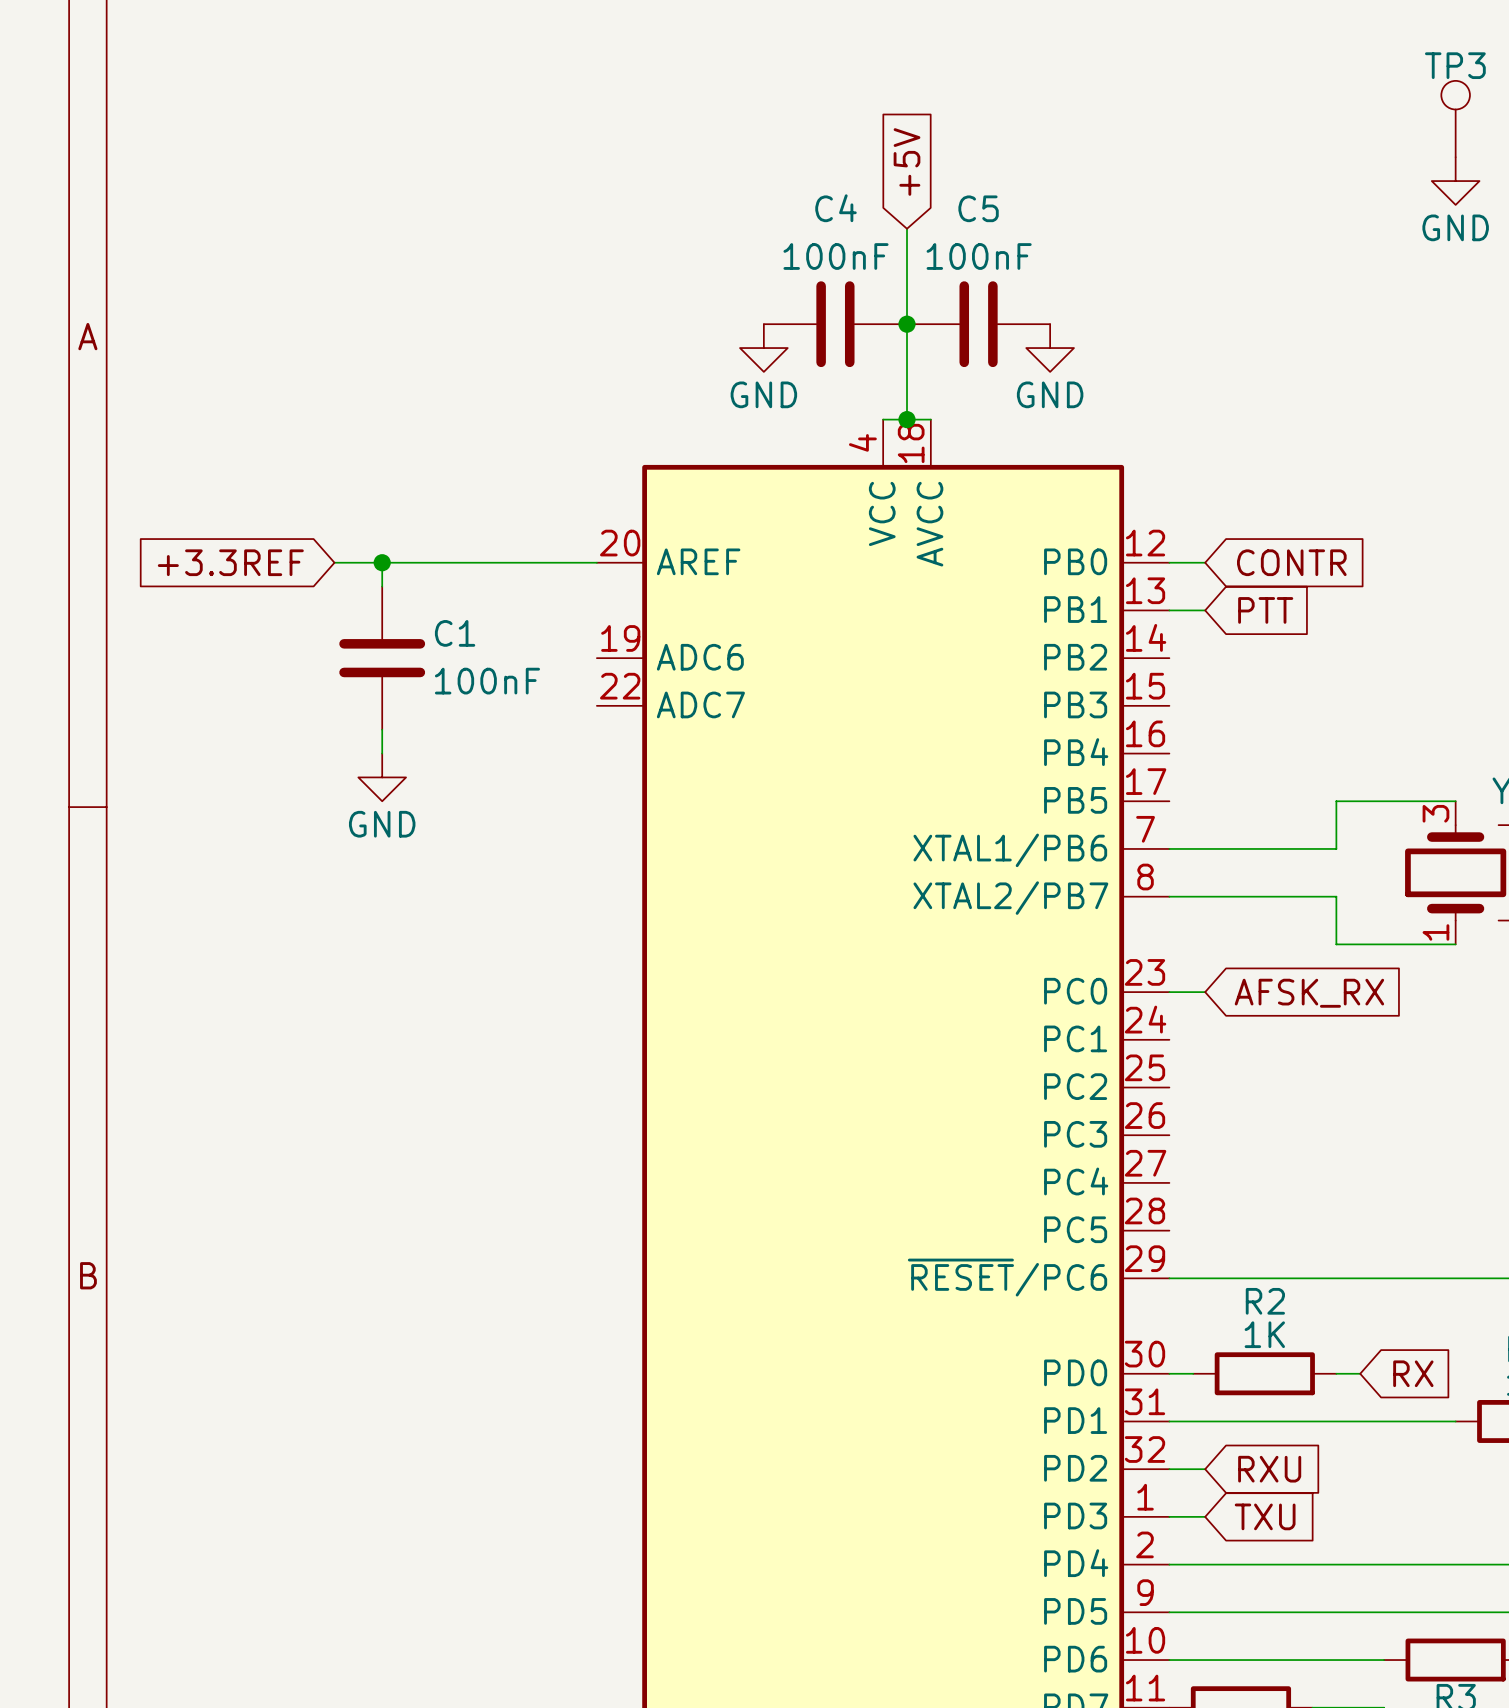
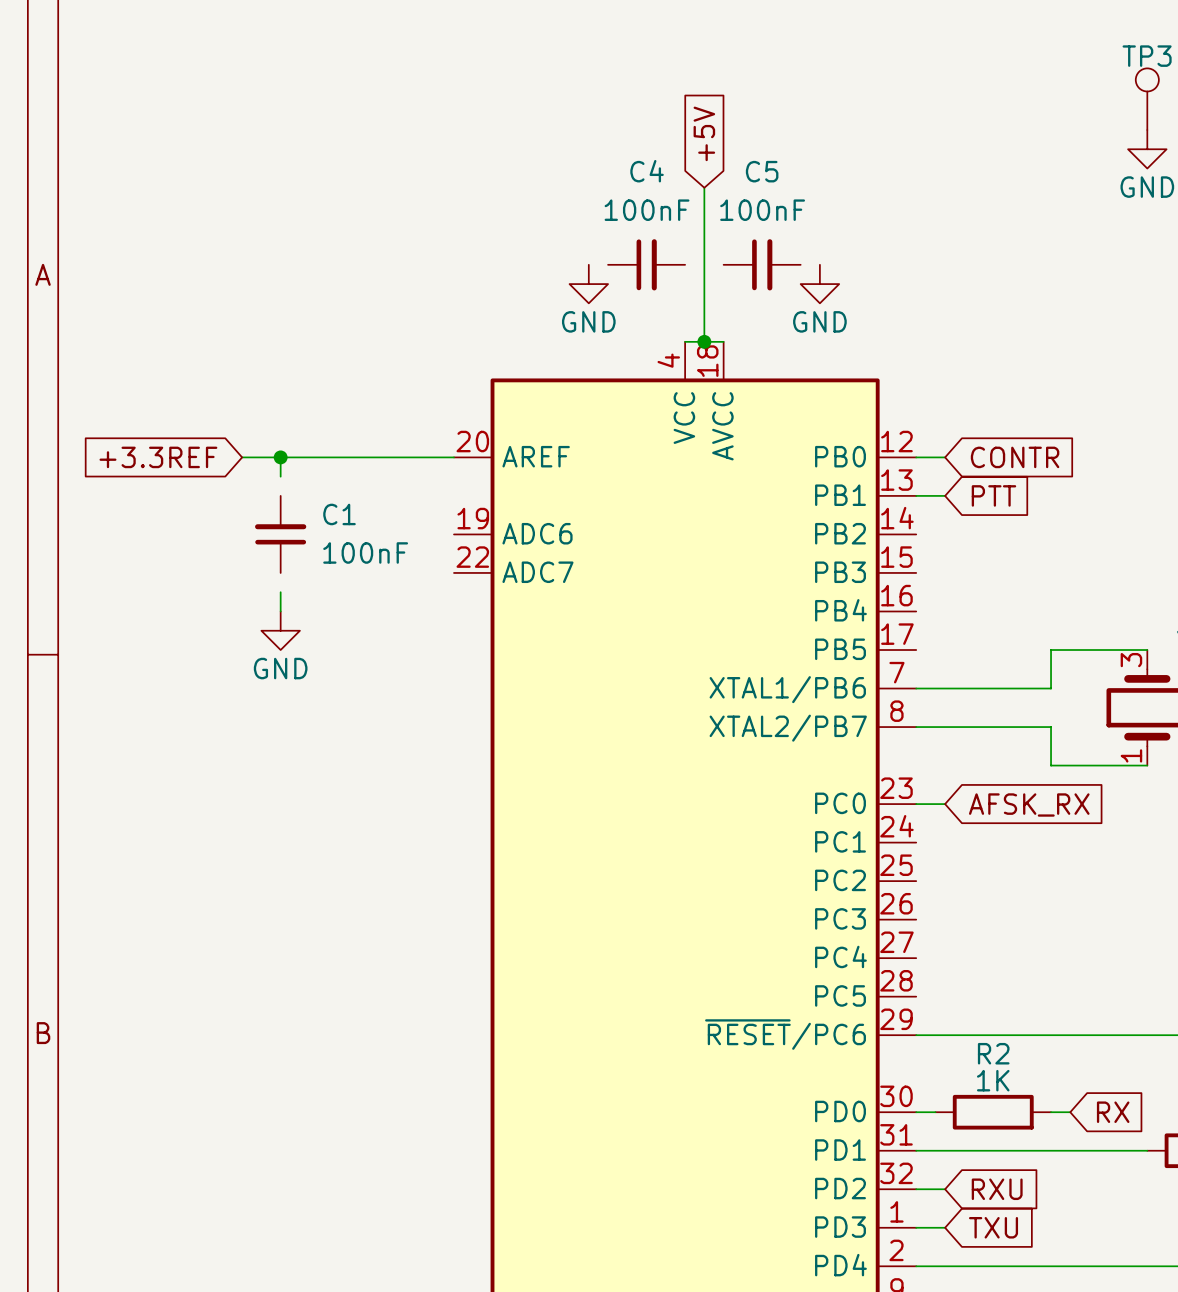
C4 symbol: [763, 281, 908, 368] -> [608, 239, 686, 291]
C5 symbol: [907, 281, 1051, 368] -> [723, 239, 801, 291]
junction: (907, 324) -> none
C1 symbol: [339, 586, 426, 730] -> [255, 495, 307, 573]

